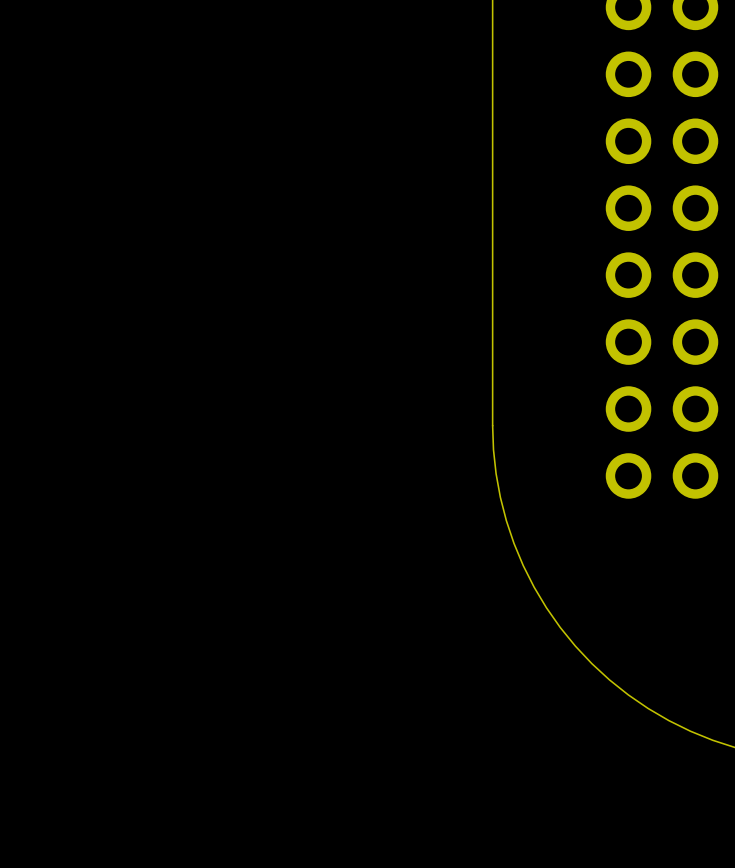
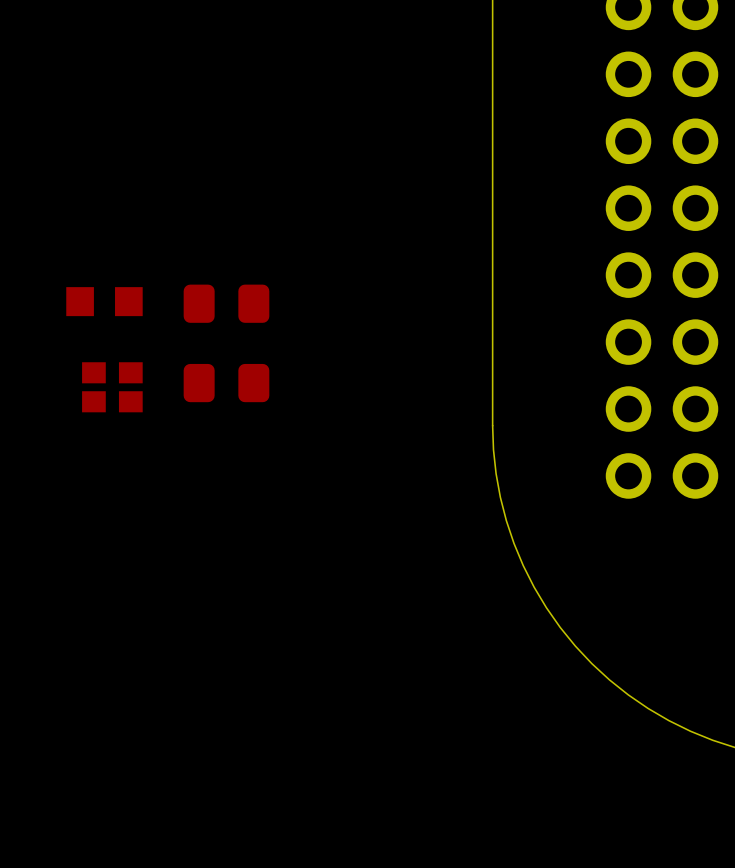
part: none -> (104, 301)
part: none -> (226, 303)
part: none -> (226, 383)
part: none -> (112, 387)

